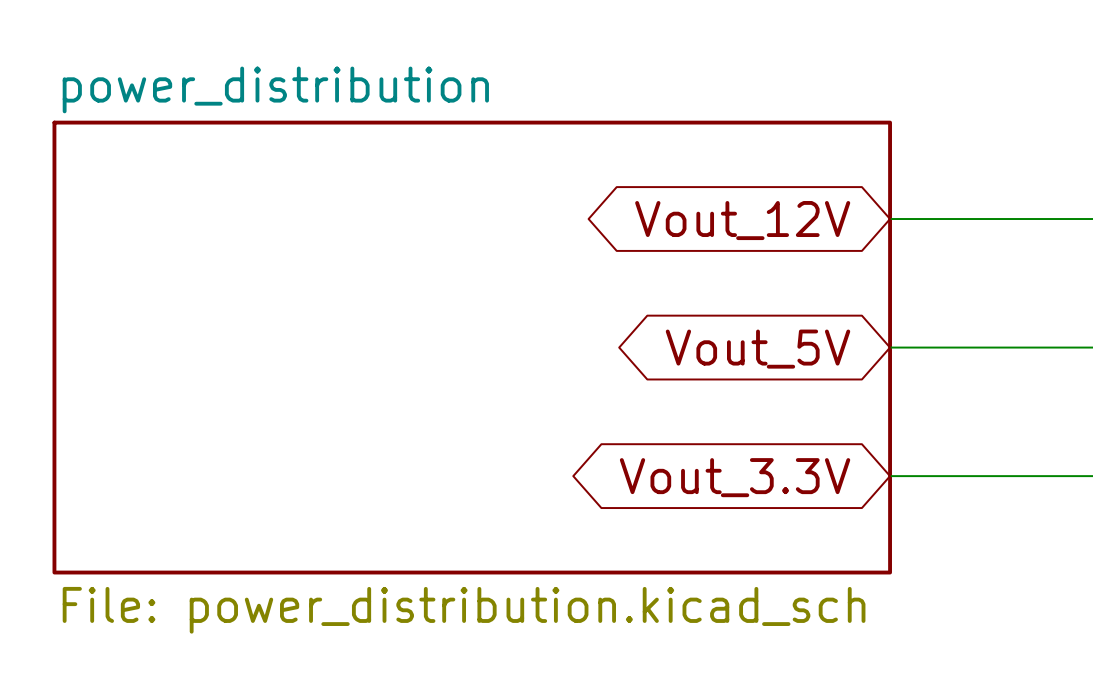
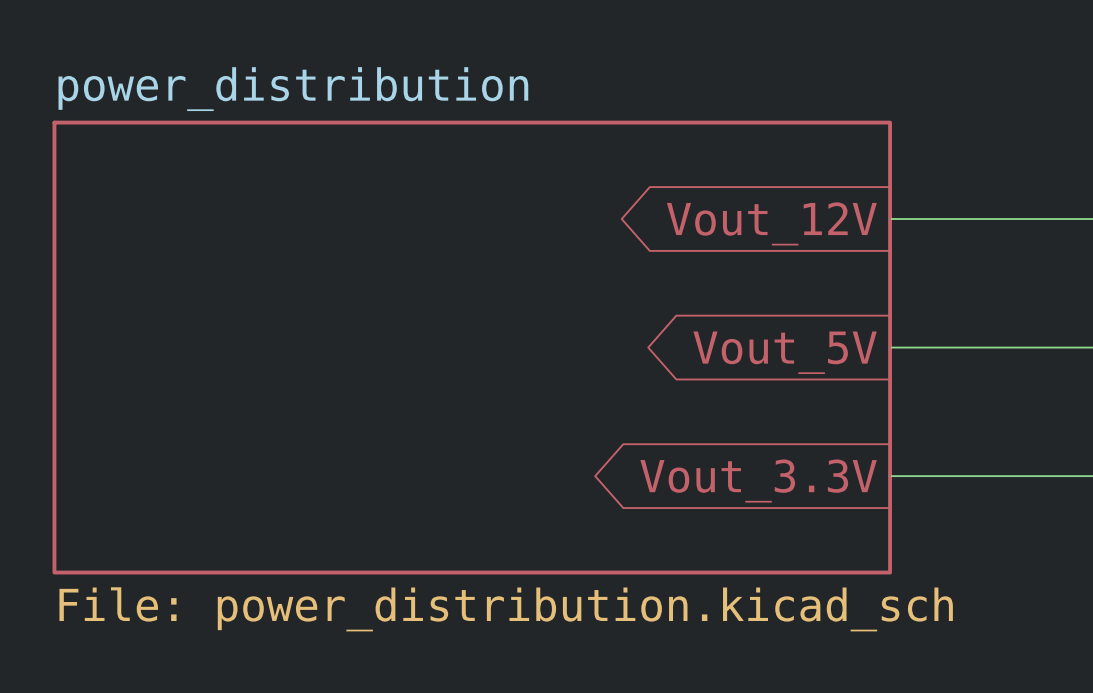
global label shape: bidirectional (742, 220) -> output (771, 223)
global label shape: bidirectional (758, 349) -> output (785, 352)
global label shape: bidirectional (735, 477) -> output (758, 481)

